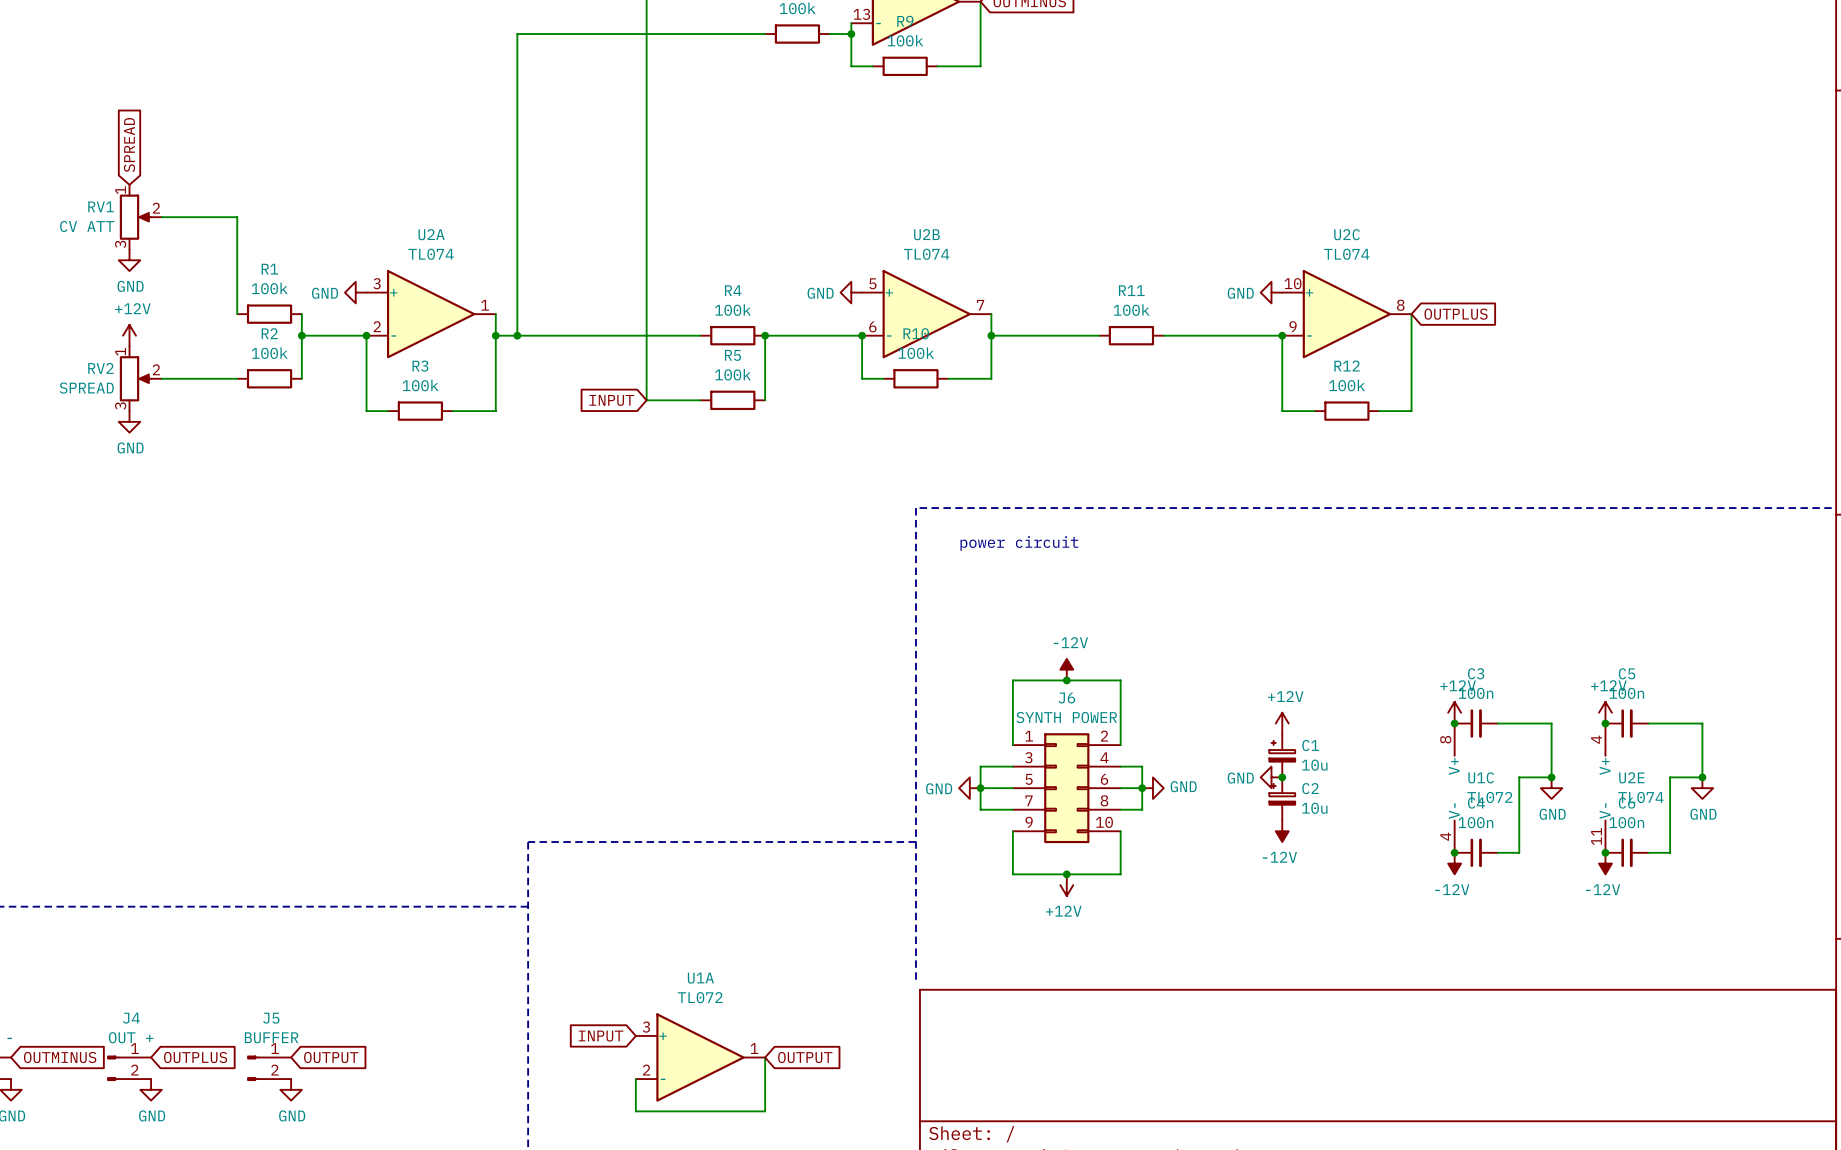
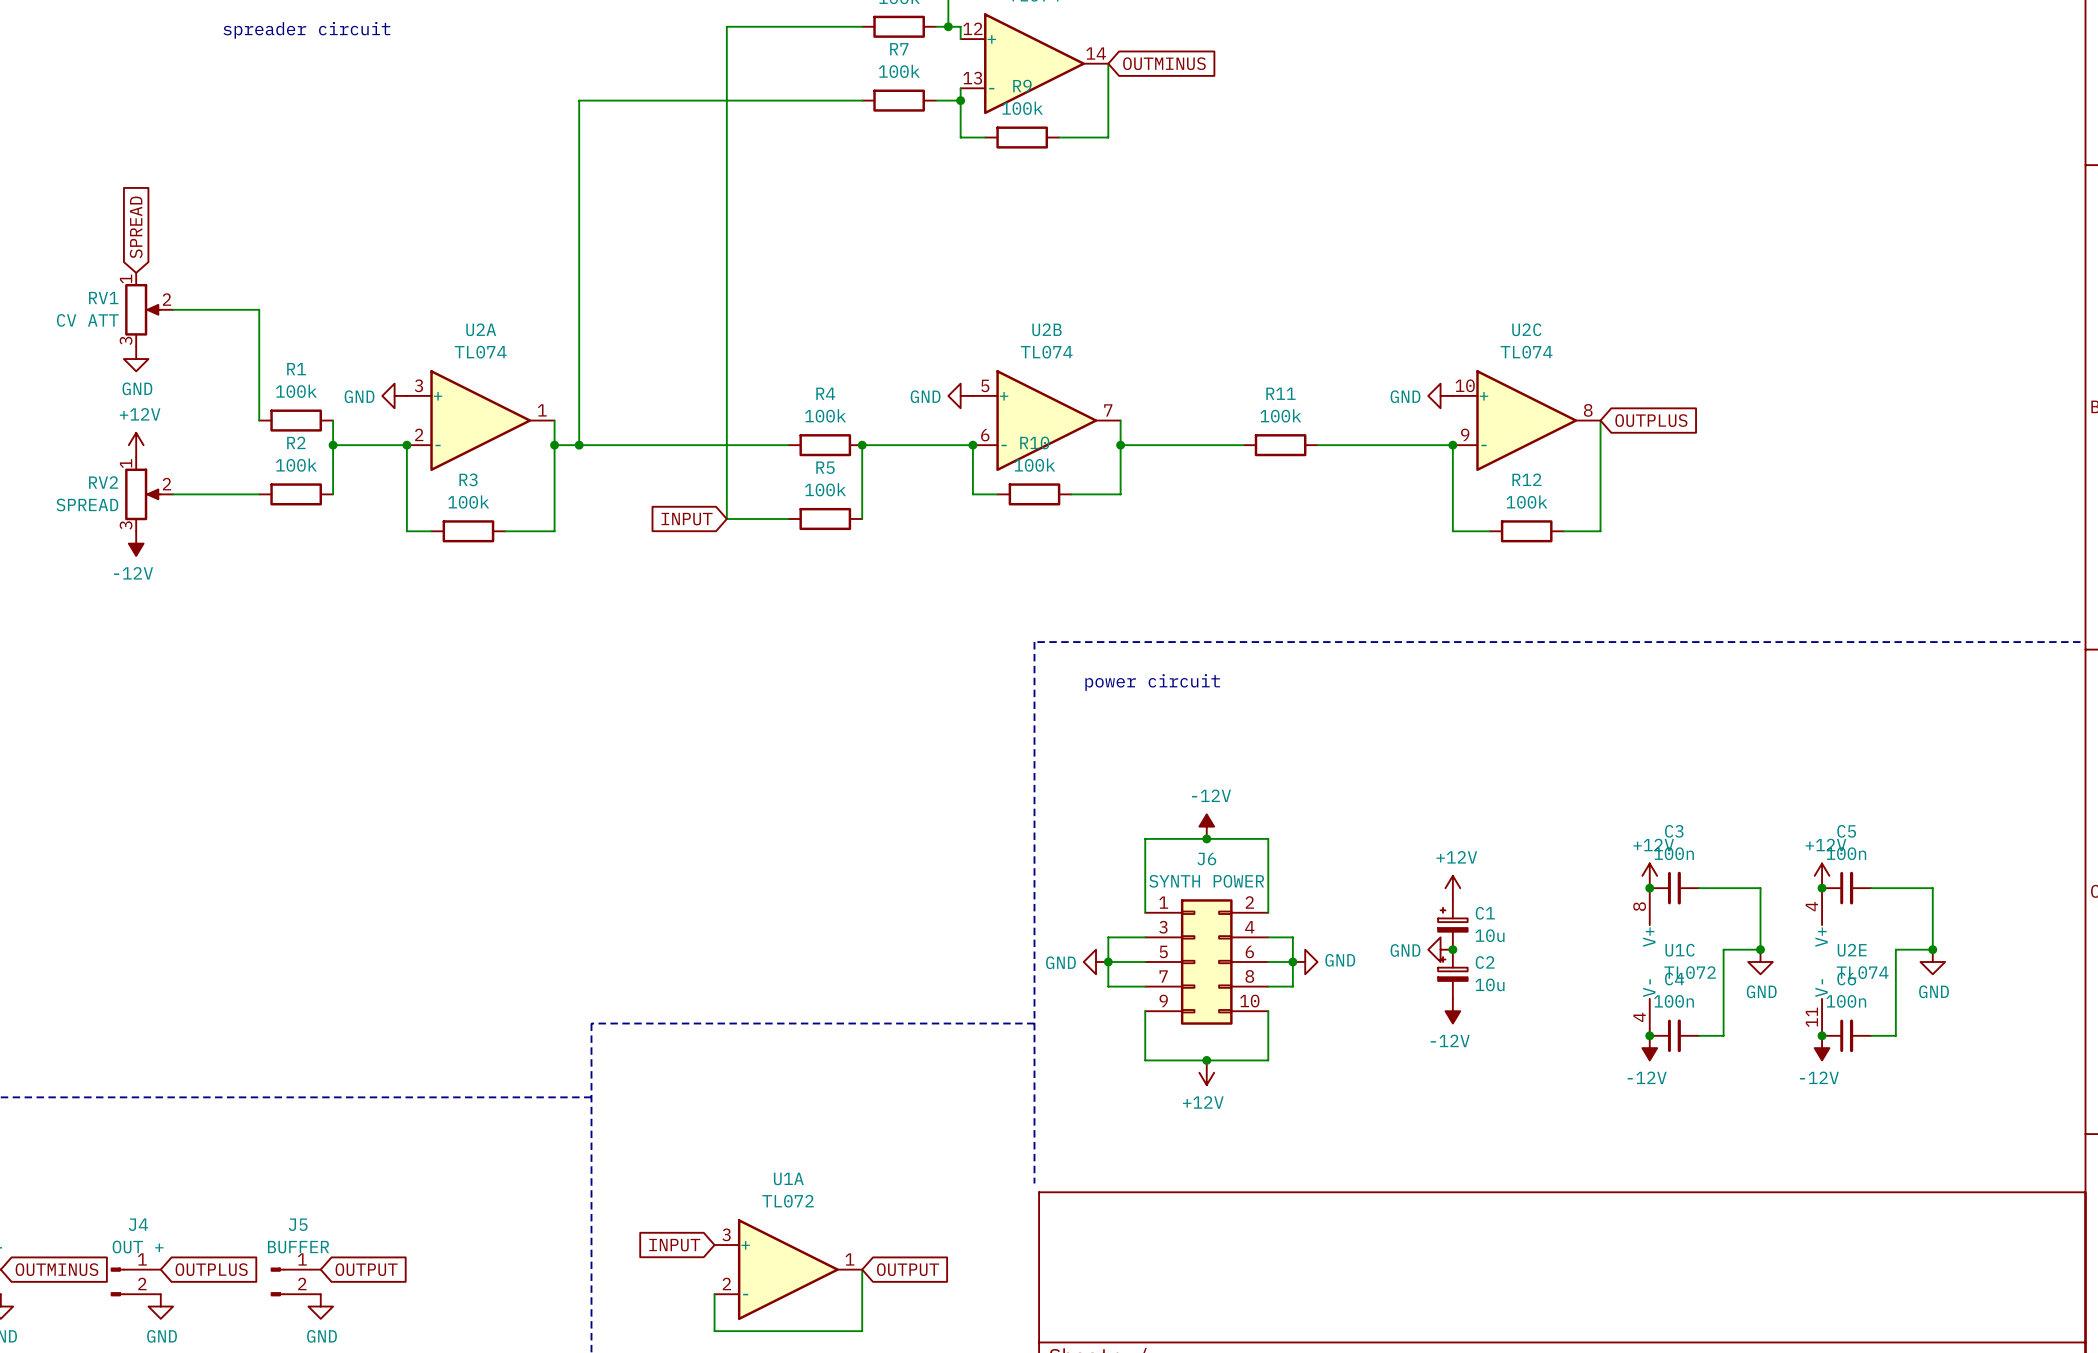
power symbol: GND (129, 421) -> -12V (136, 543)

